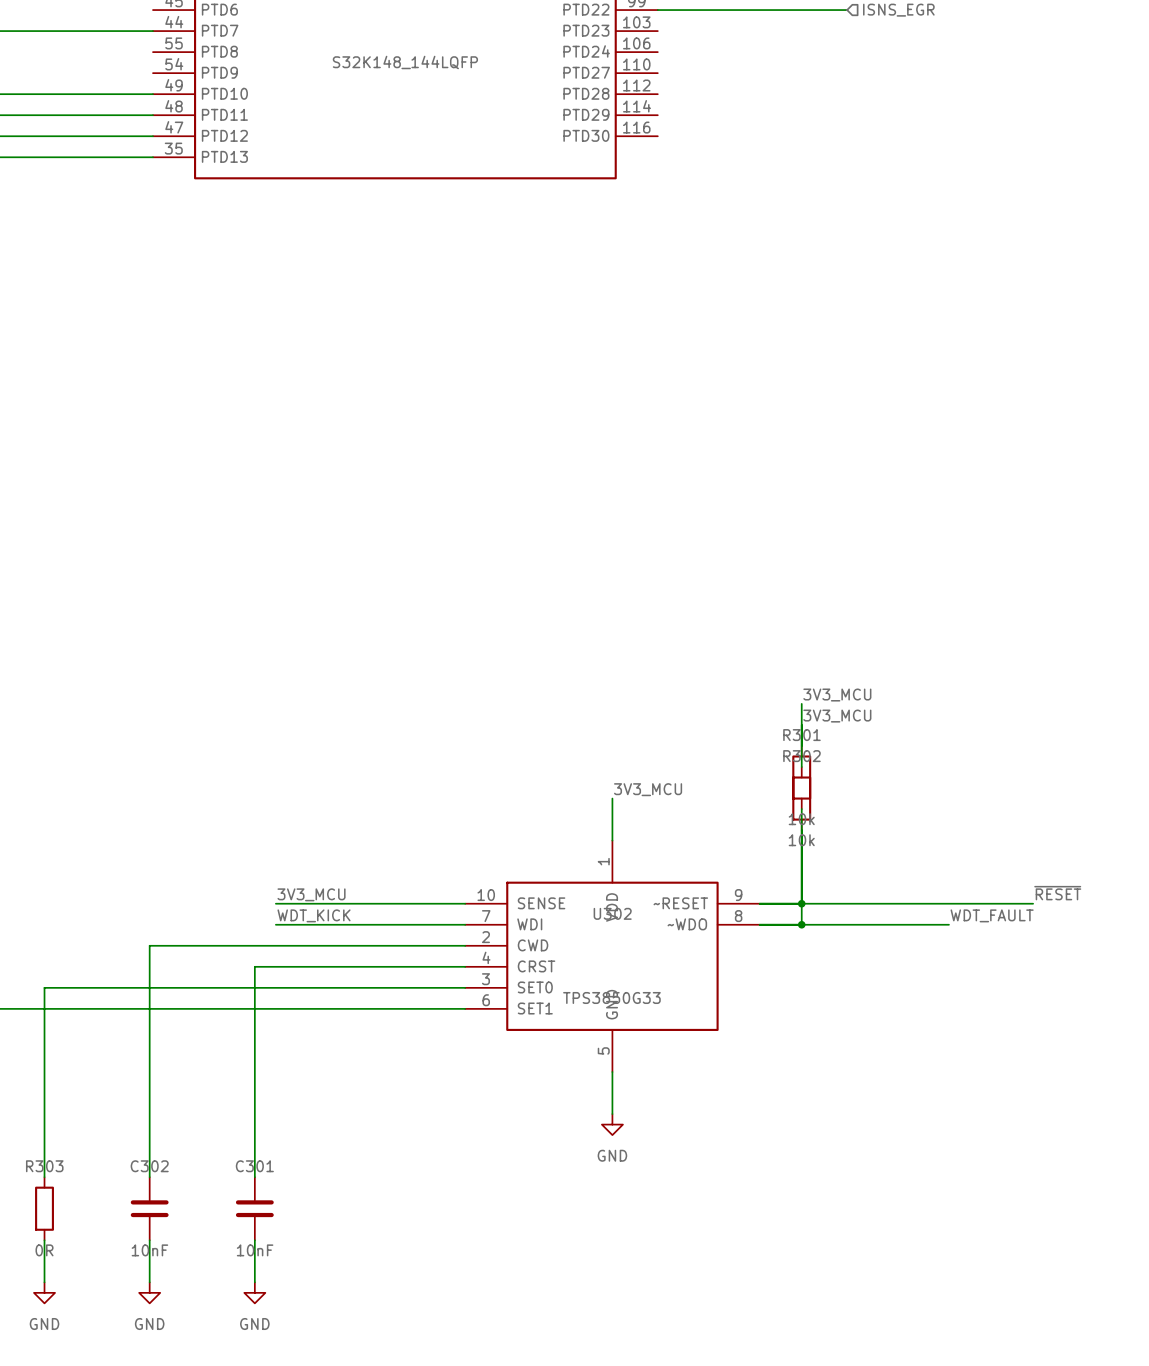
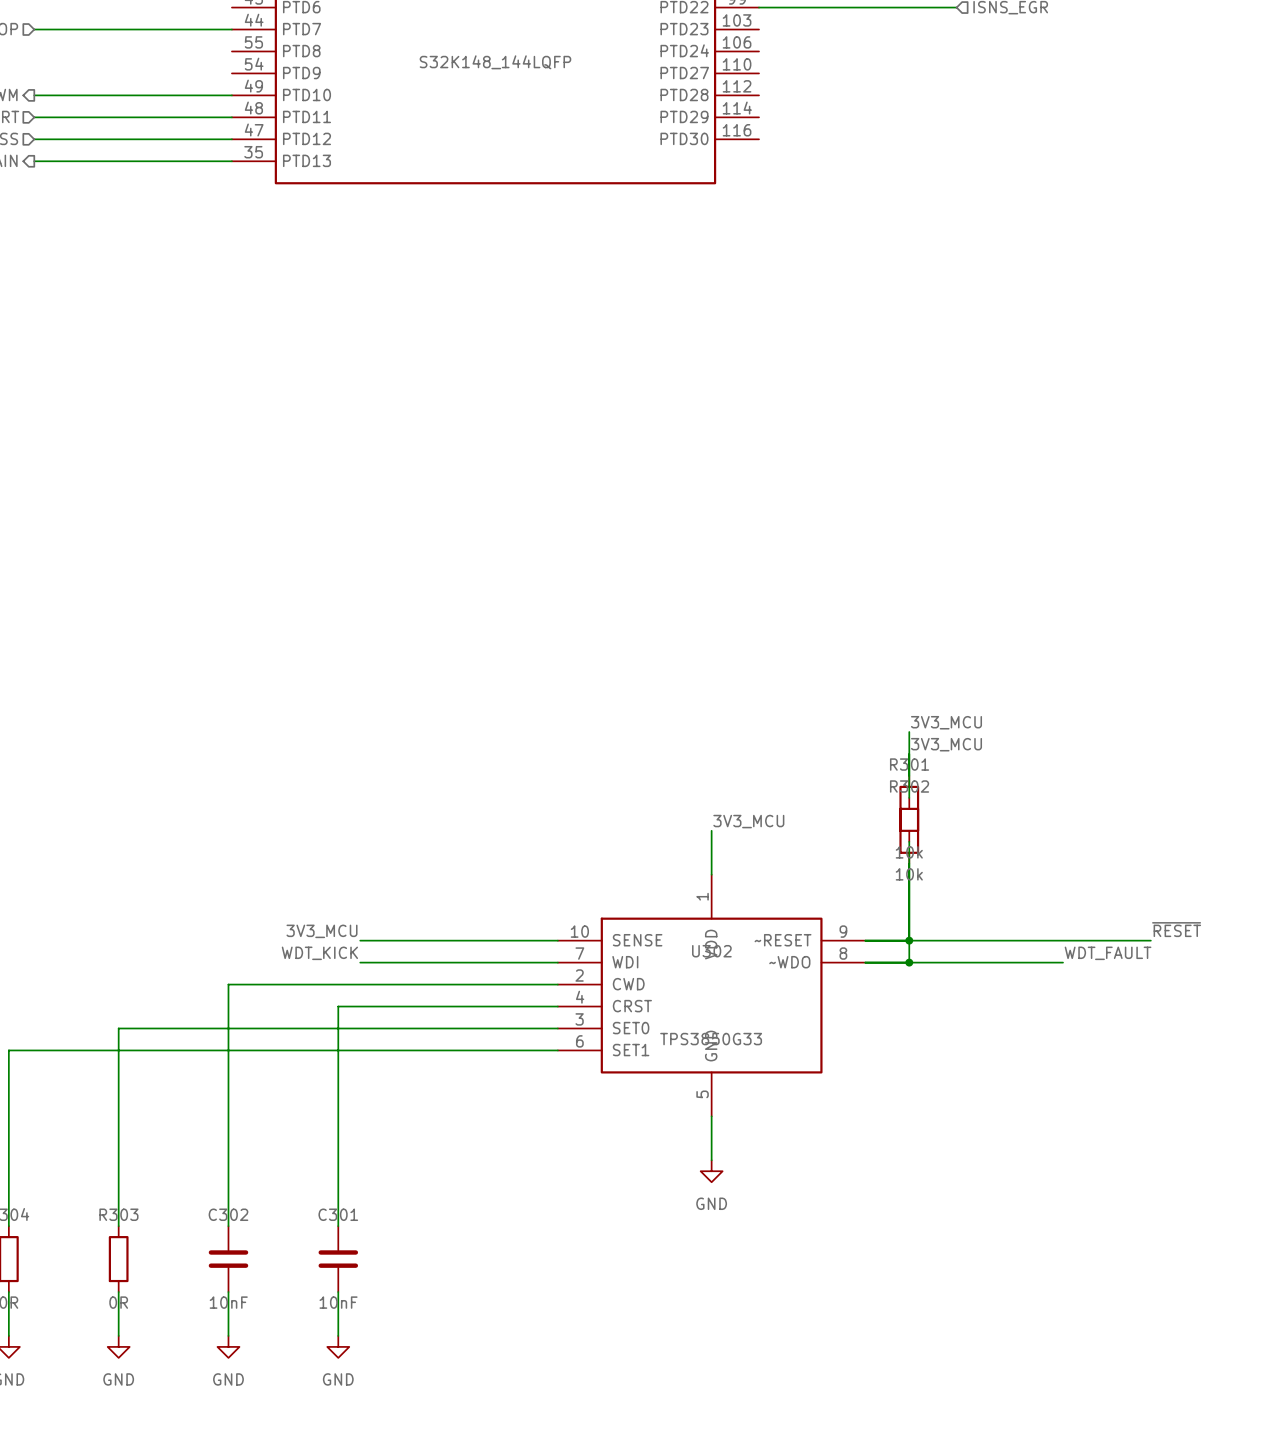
label position: 3V3_MCU (311, 894) -> 3V3_MCU (321, 931)
label position: WDT_KICK (314, 915) -> WDT_KICK (319, 953)

